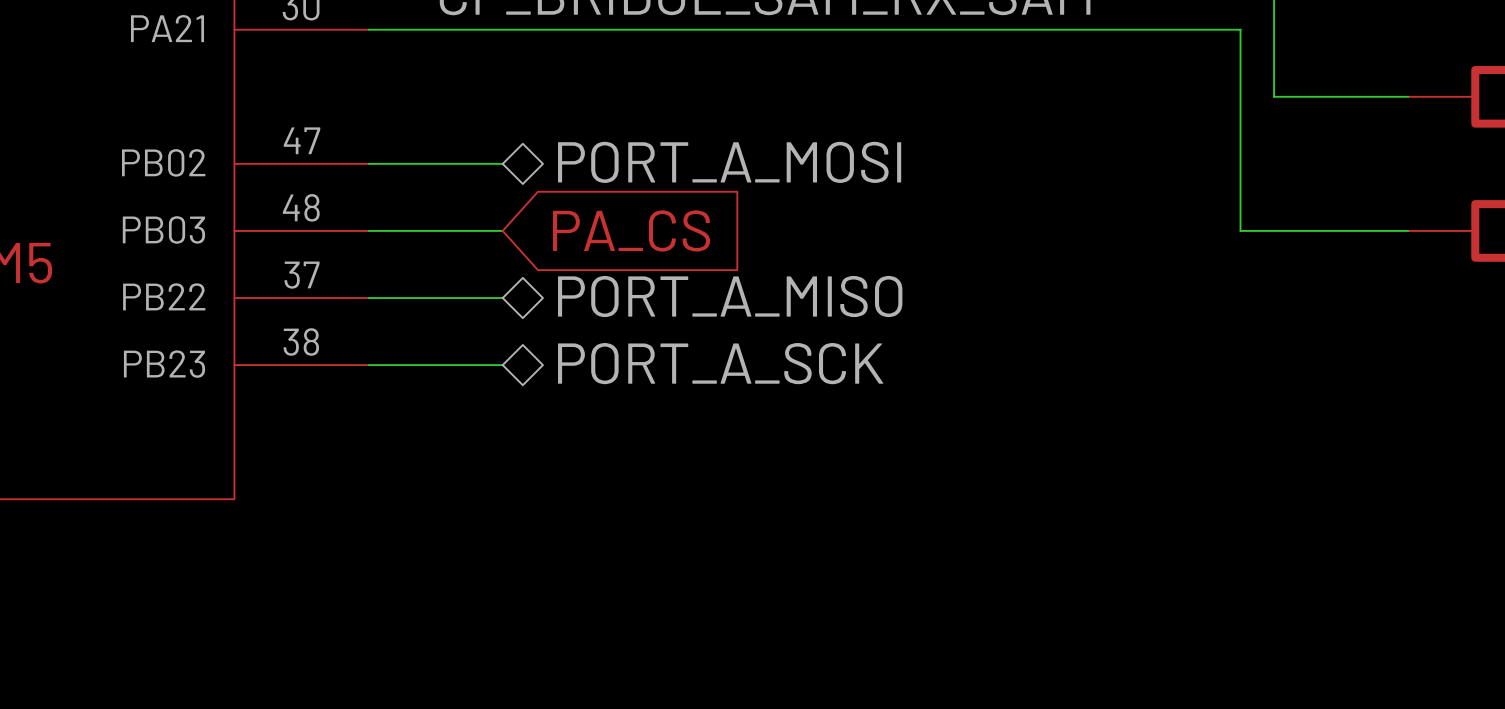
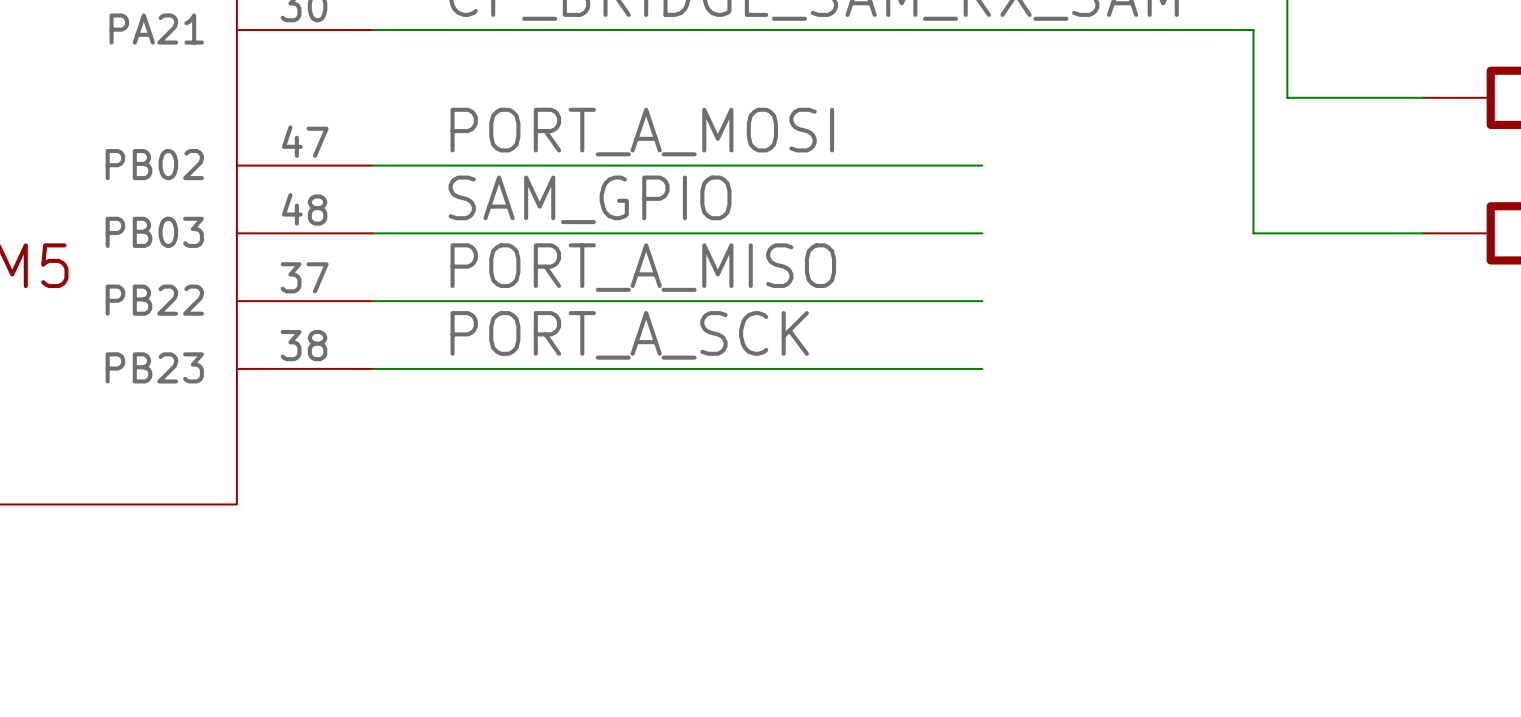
label: none -> PORT_A_MOSI (642, 132)
hierarchical label: PORT_A_MOSI (729, 162) -> none
wire: none -> (507, 165) (982, 165)
label: none -> SAM_GPIO (590, 199)
wire: none -> (507, 233) (982, 233)
global label: PA_CS (631, 230) -> none
label: none -> PORT_A_MISO (643, 267)
hierarchical label: PORT_A_MISO (730, 296) -> none
wire: none -> (507, 301) (982, 301)
label: none -> PORT_A_SCK (629, 335)
hierarchical label: PORT_A_SCK (720, 363) -> none
wire: none -> (507, 368) (982, 368)

